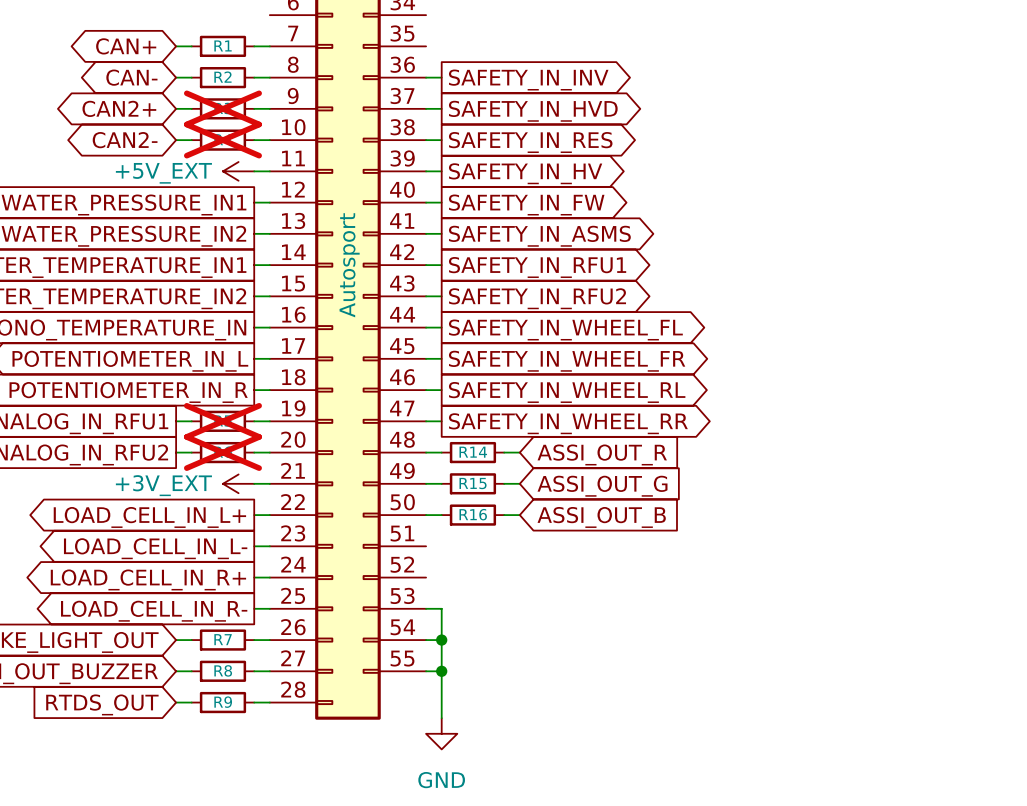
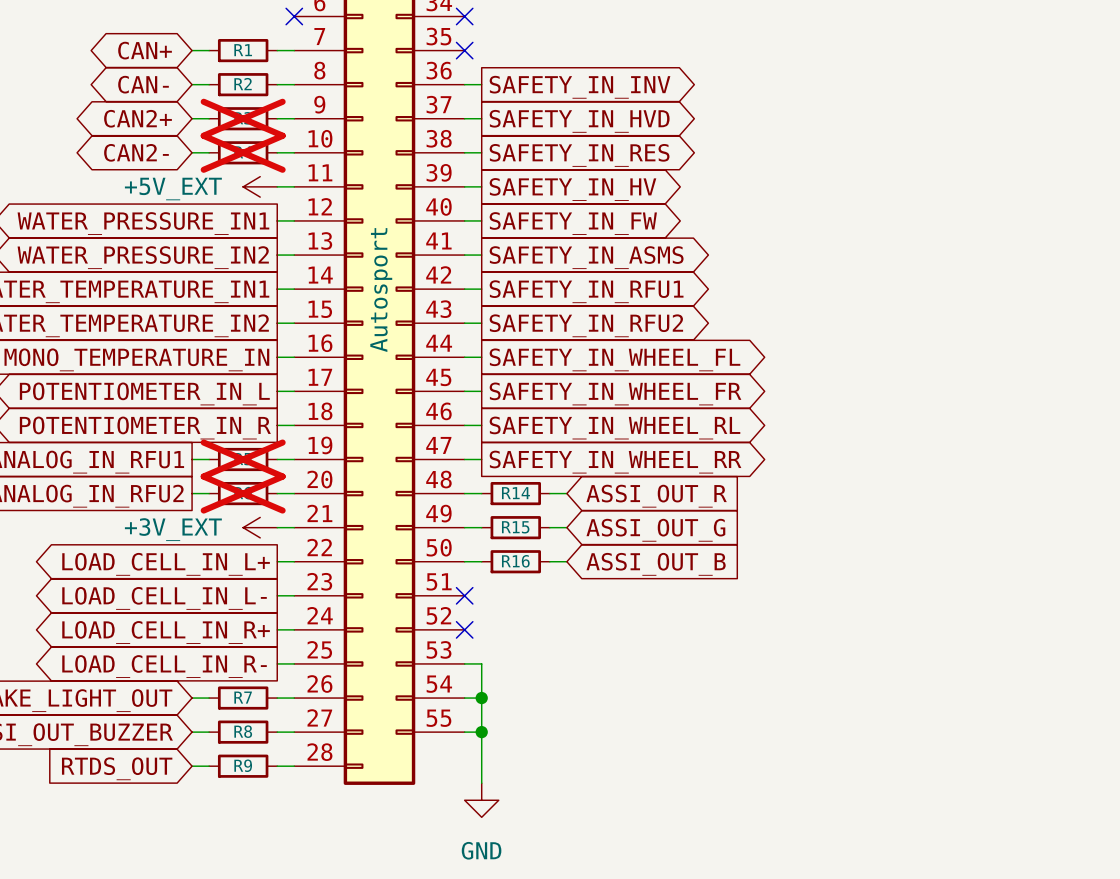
no-connect mark: none -> (294, 16)
no-connect mark: none -> (464, 16)
no-connect mark: none -> (464, 50)
no-connect mark: none -> (464, 595)
no-connect mark: none -> (464, 629)

